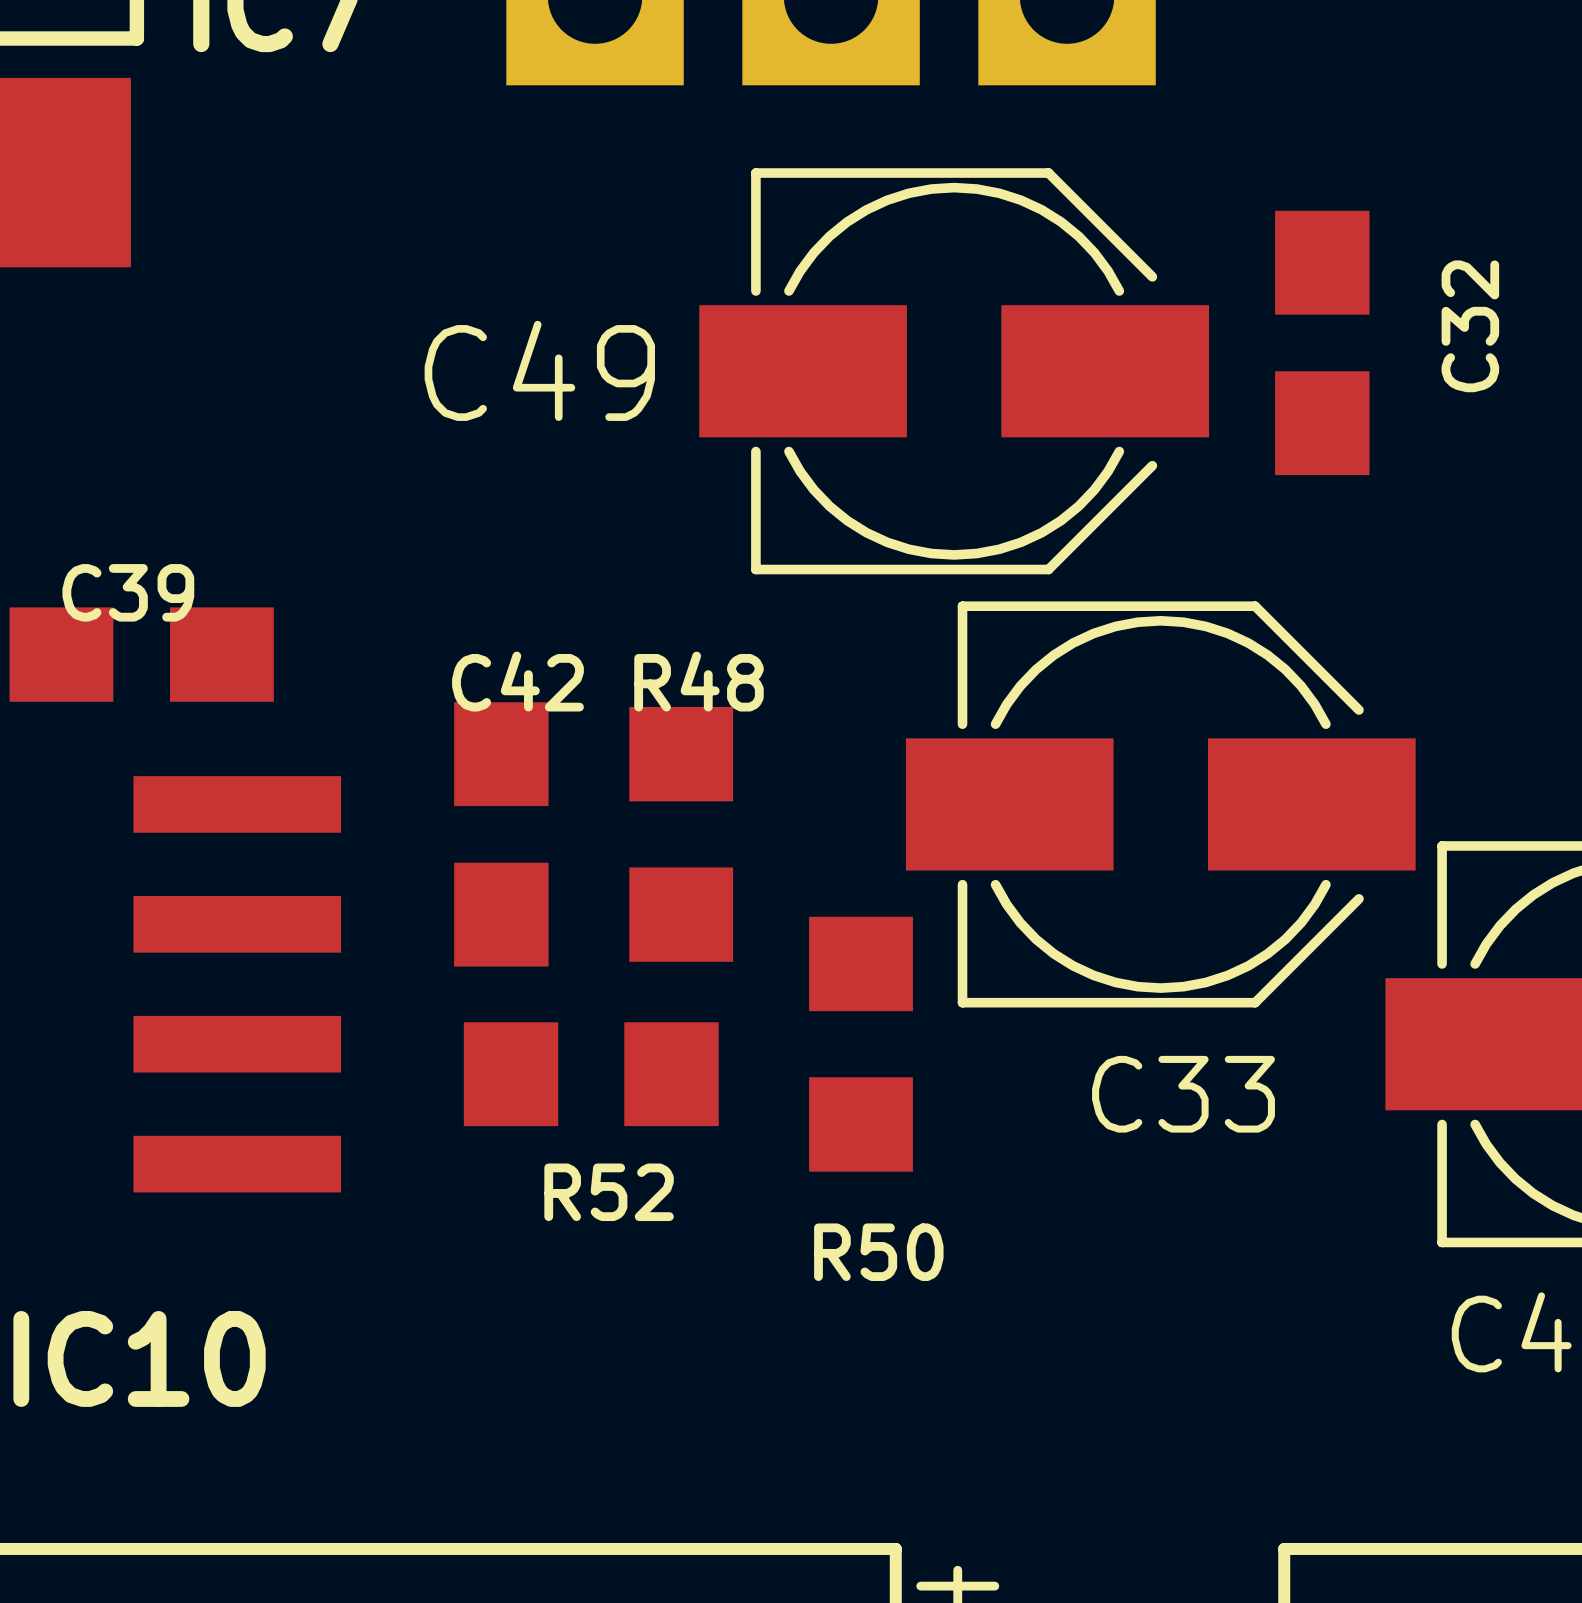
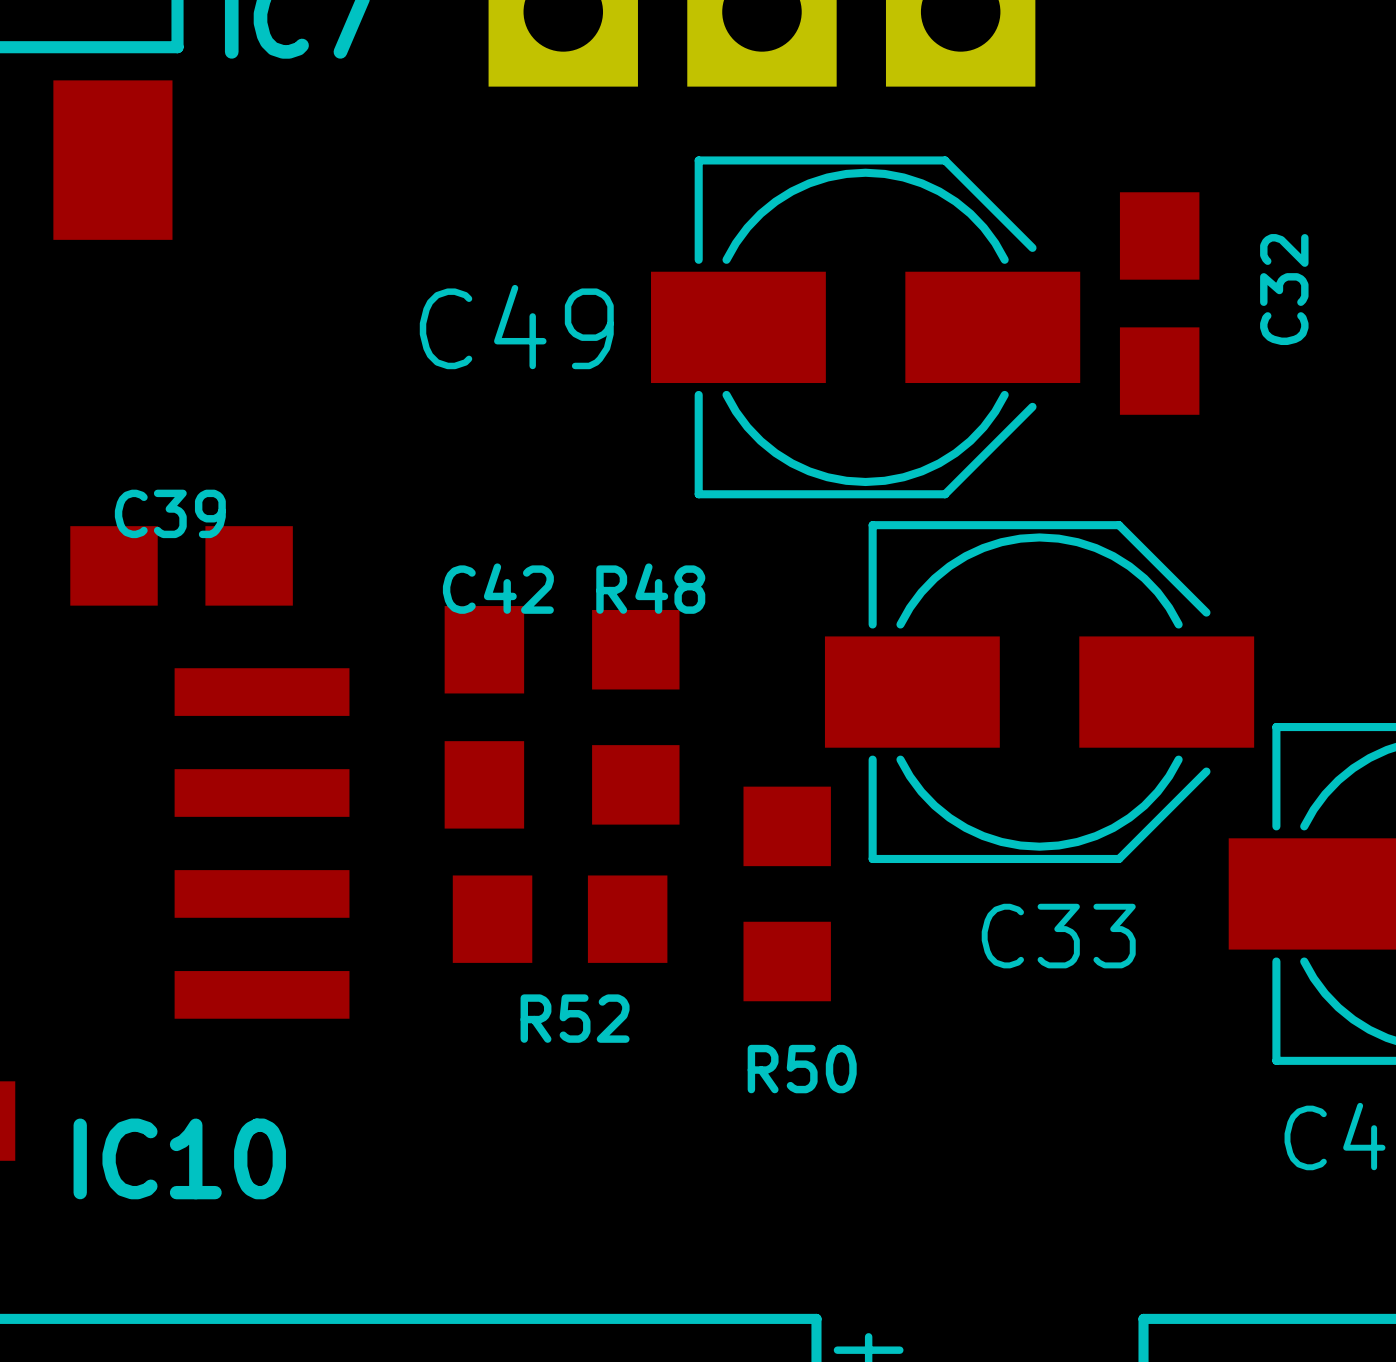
C32 position: (1322, 342) -> (1159, 303)

